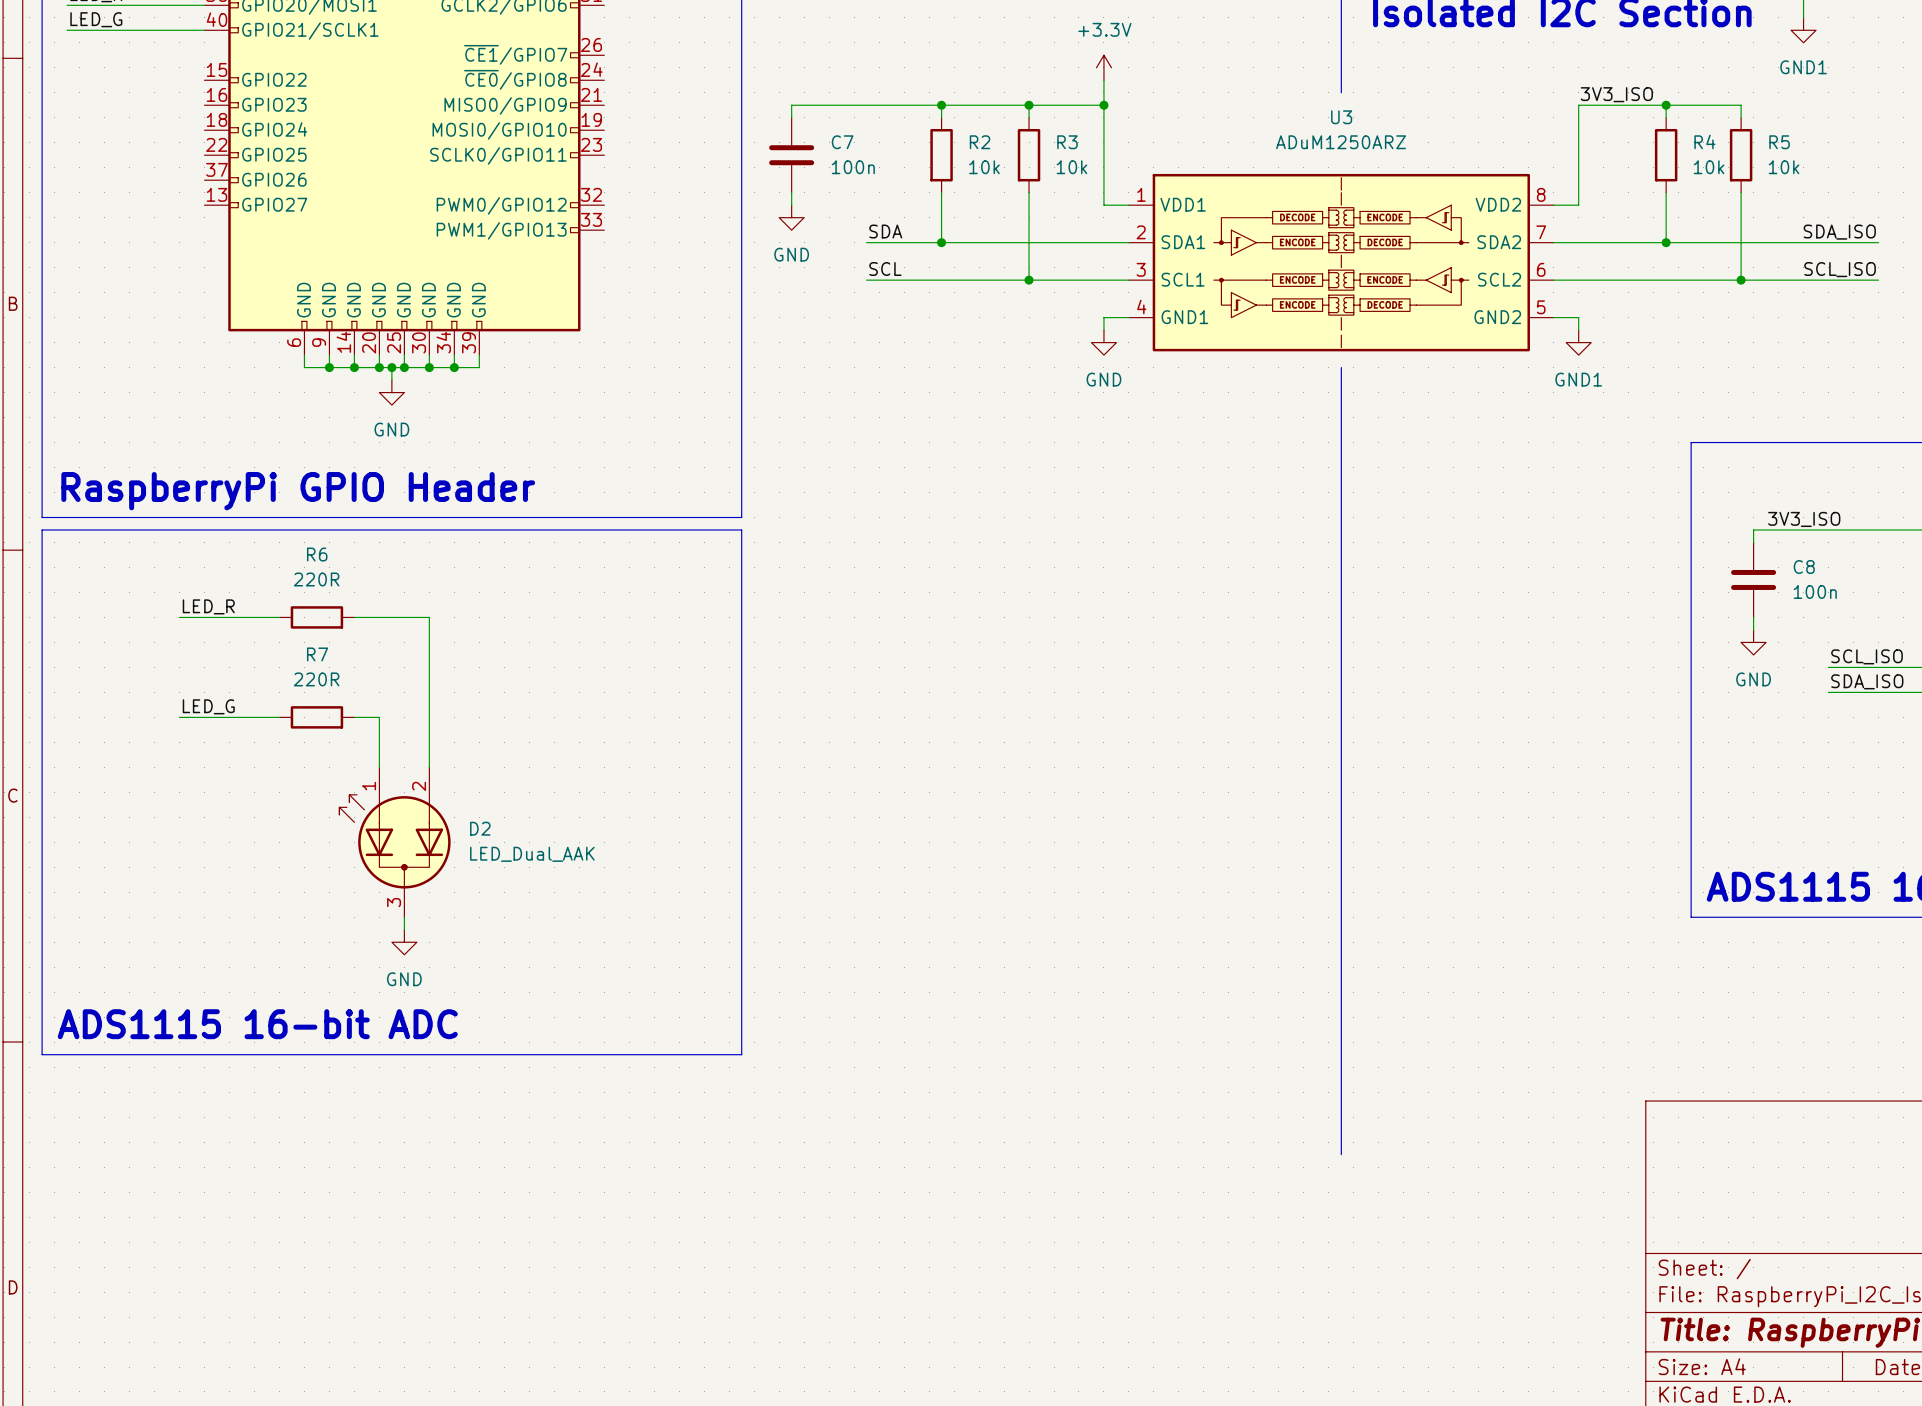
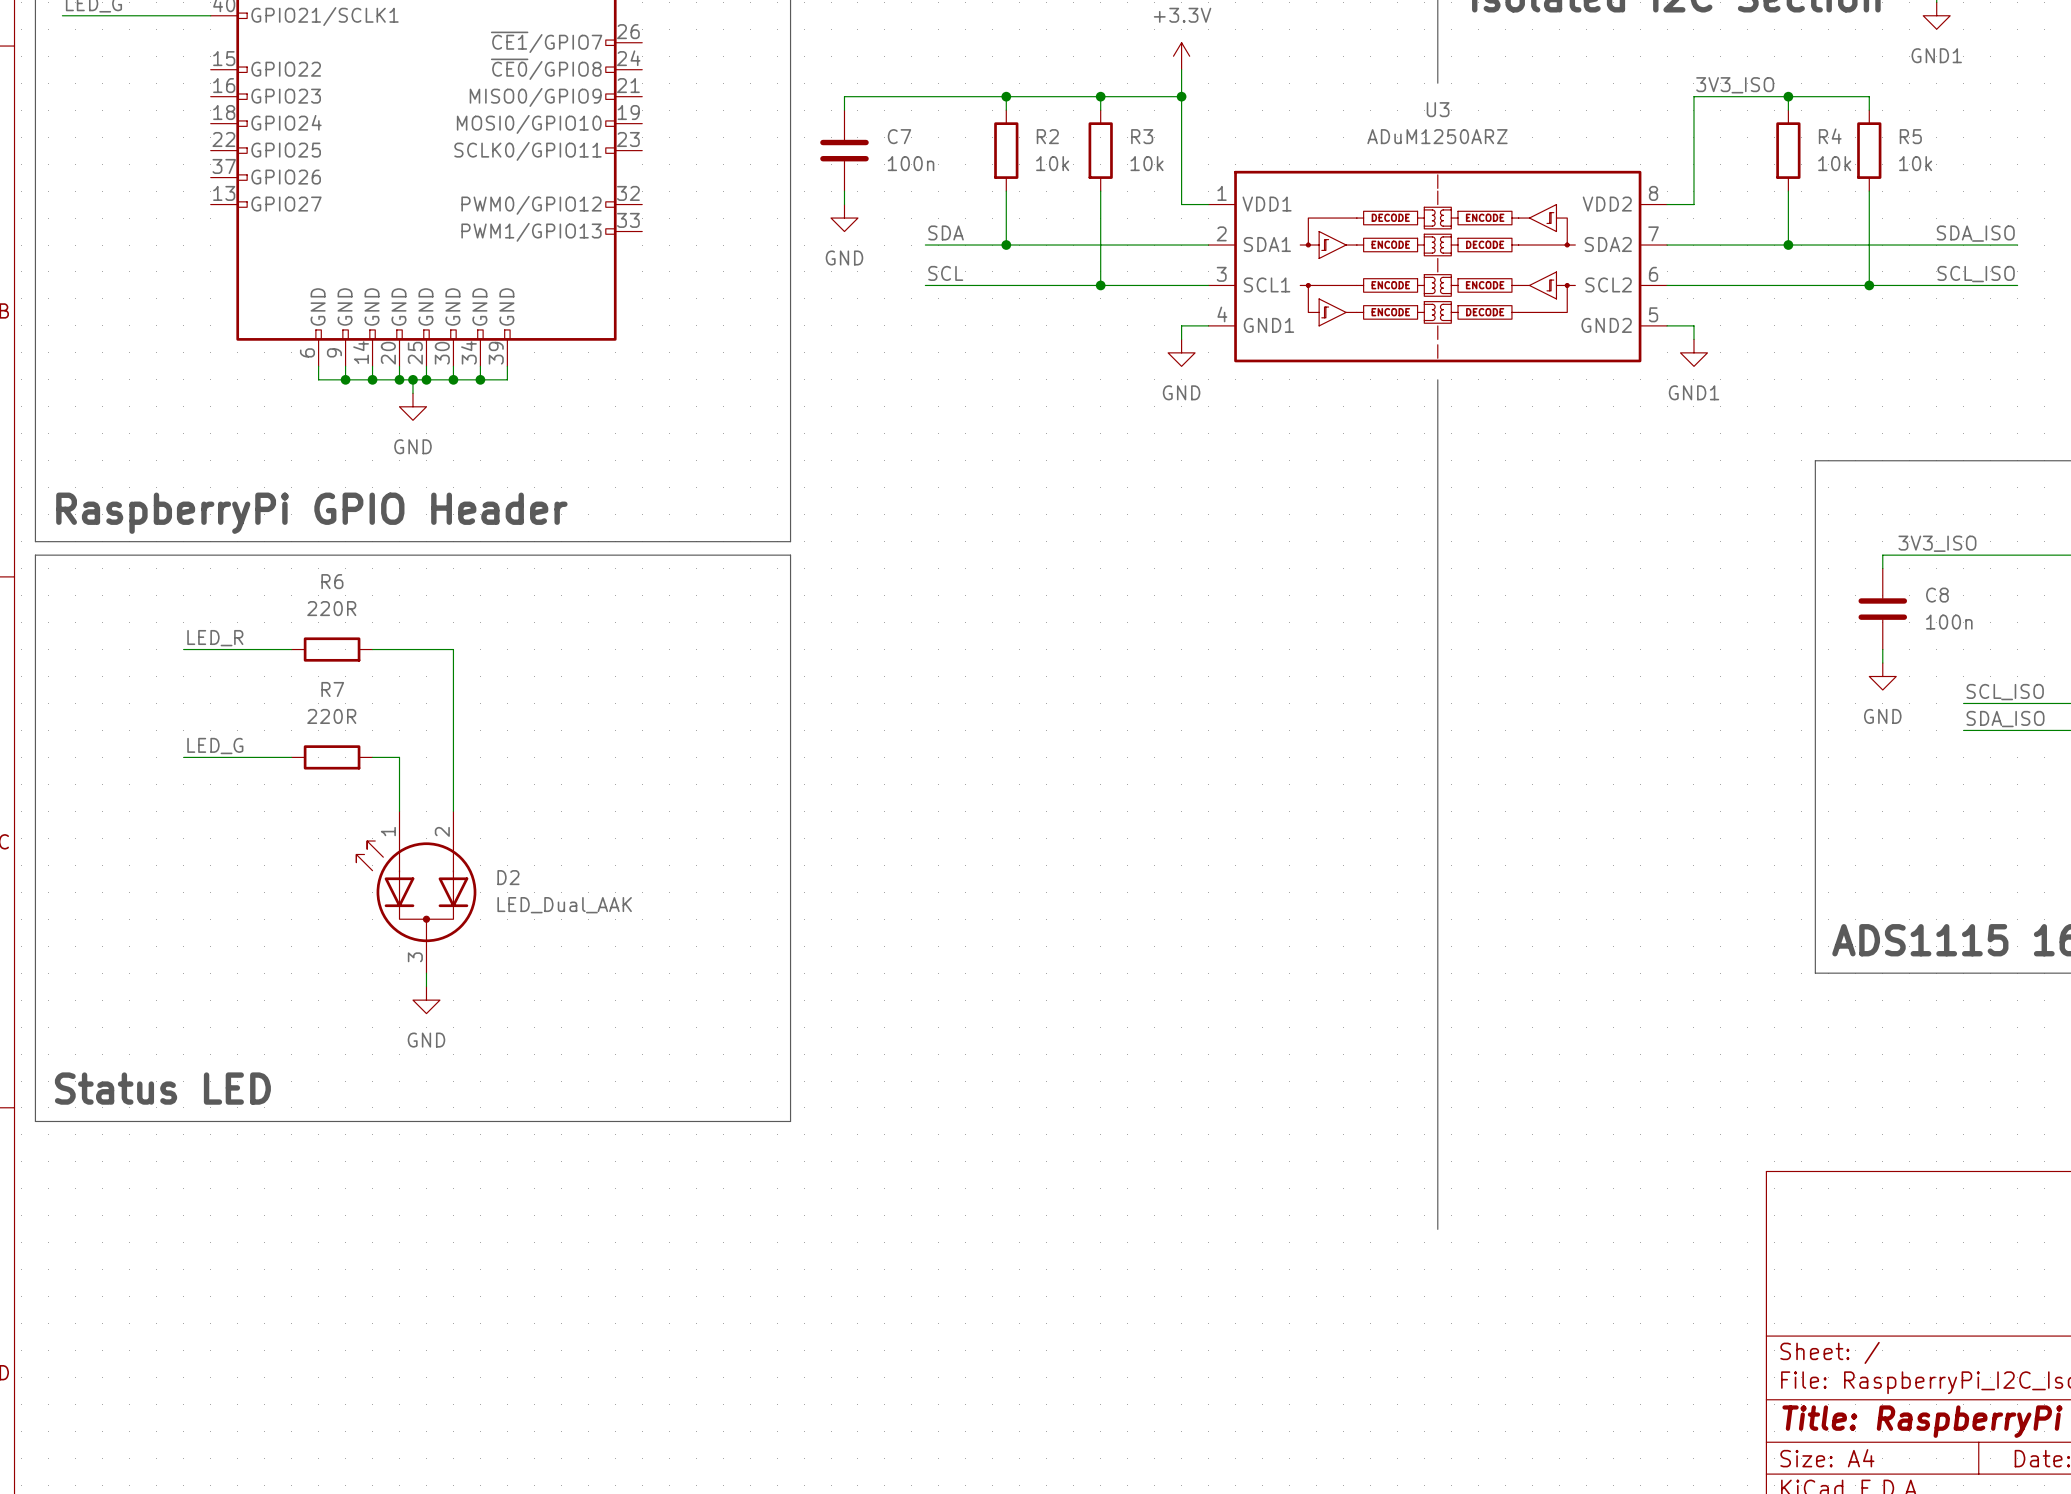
text: ADS1115 16-bit ADC (257, 1024) -> Status LED (162, 1088)

